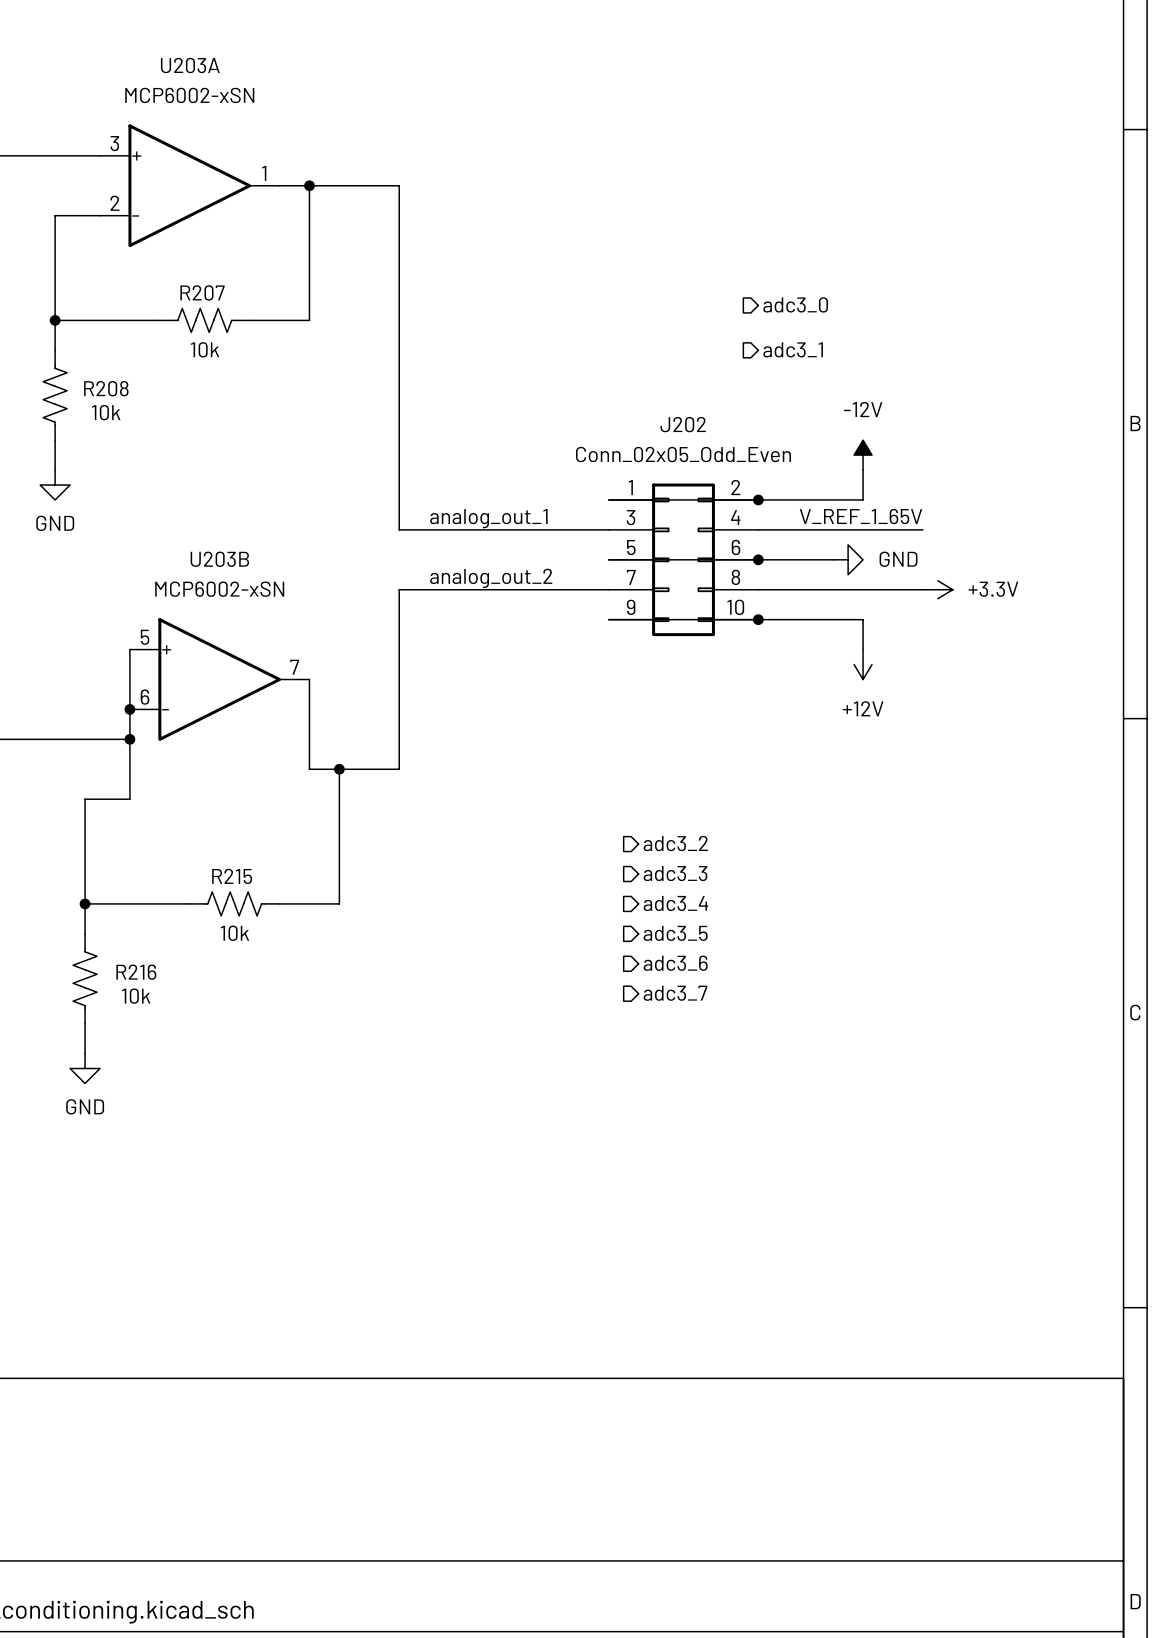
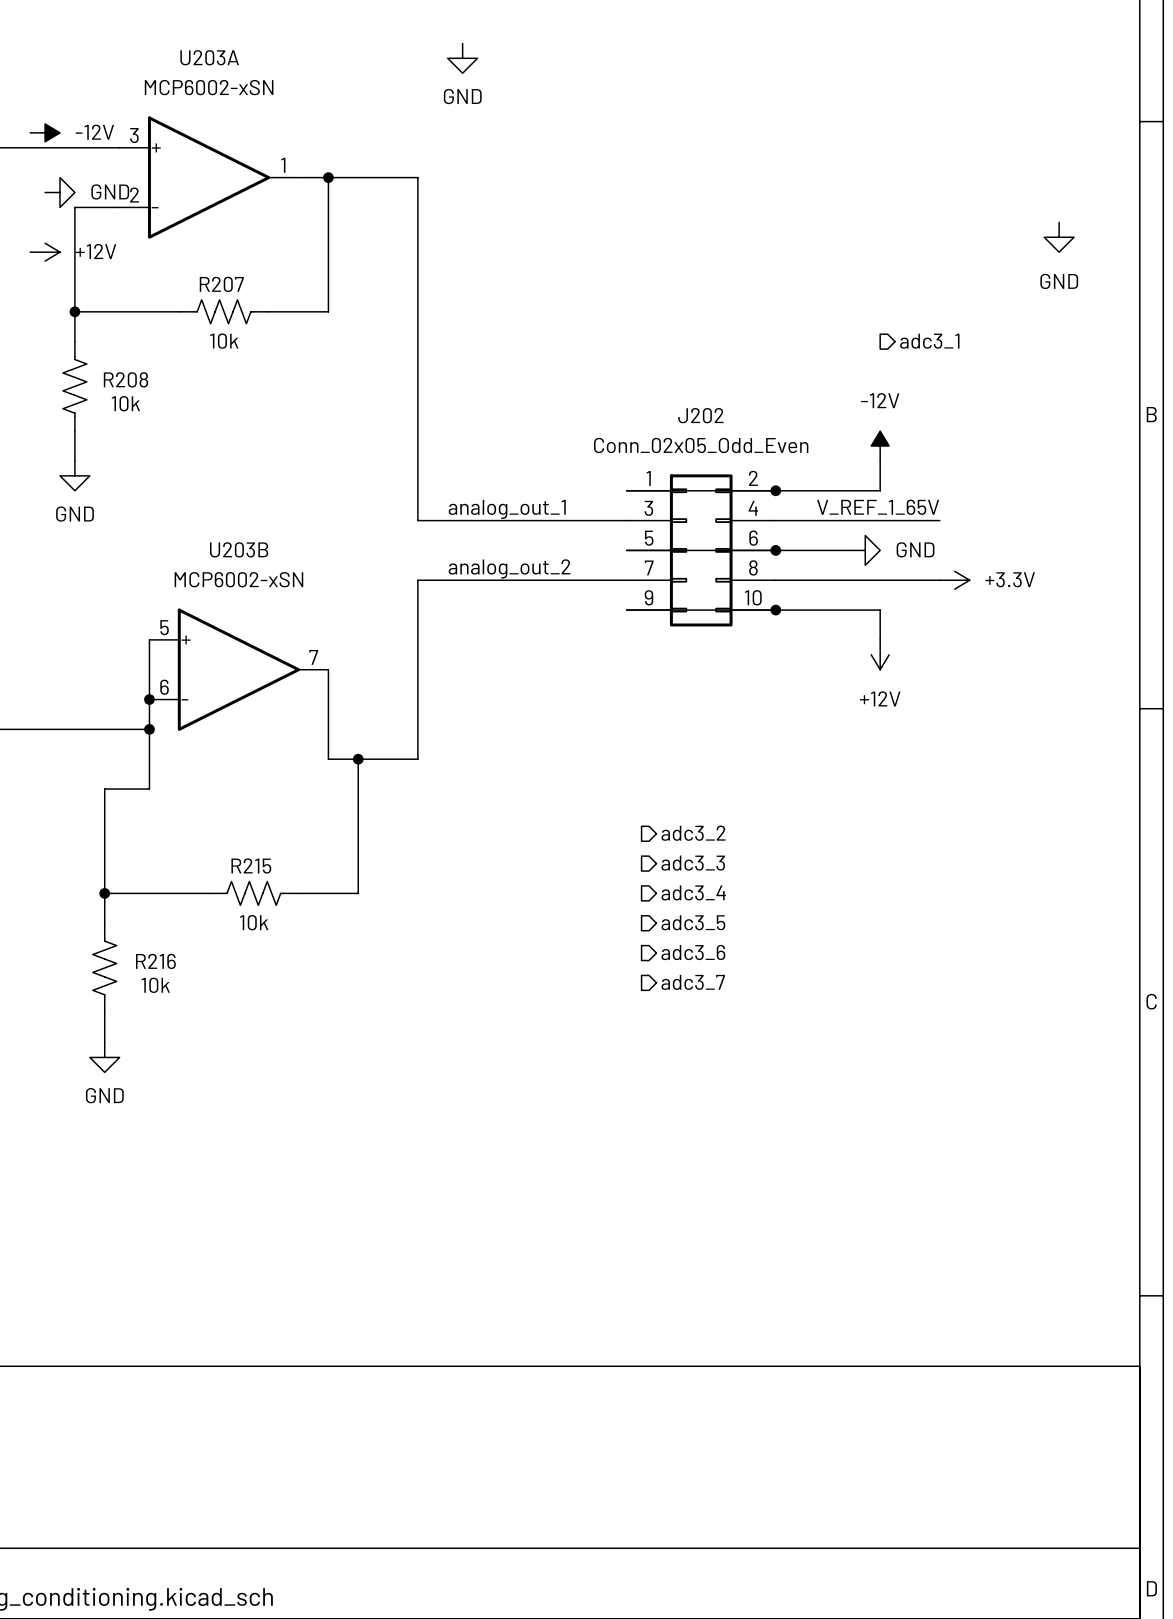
power symbol: none -> GND (462, 58)
power symbol: none -> -12V (45, 132)
power symbol: none -> GND (59, 192)
power symbol: none -> GND (1059, 237)
power symbol: none -> +12V (45, 252)
hierarchical label: adc3_0 (795, 304) -> none
hierarchical label position: adc3_1 (793, 349) -> adc3_1 (929, 341)

